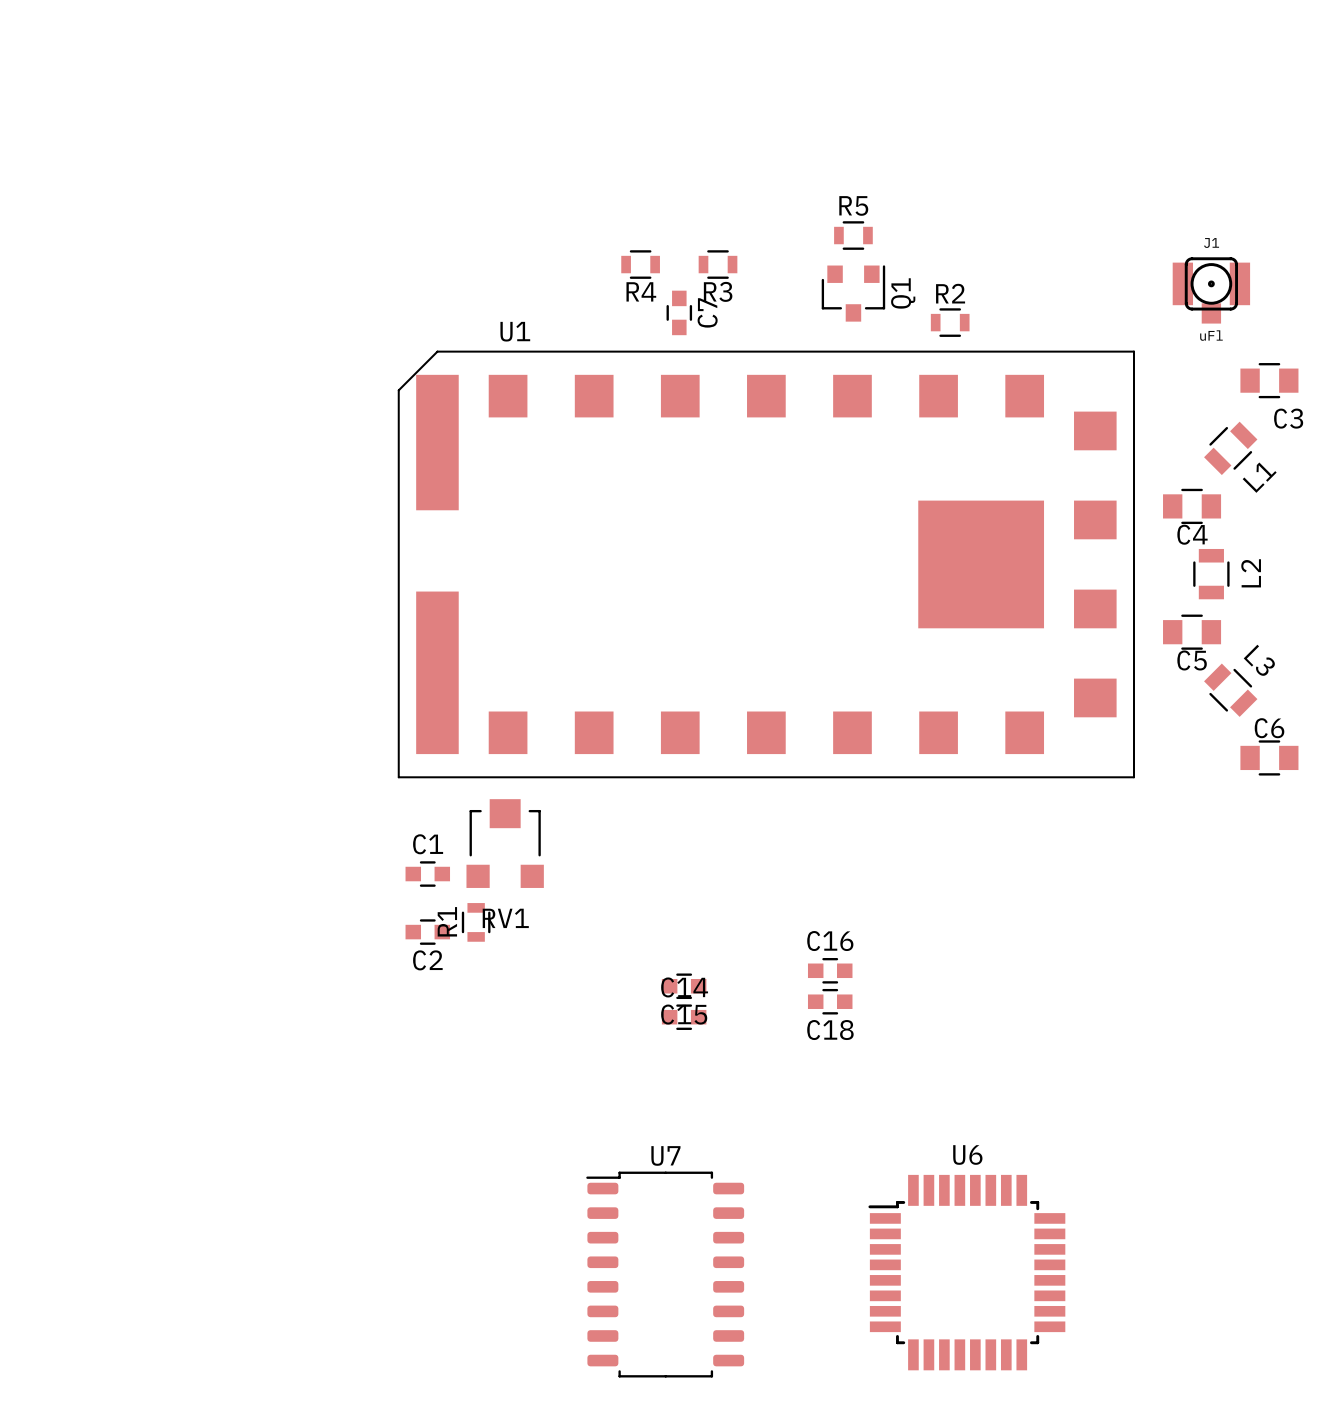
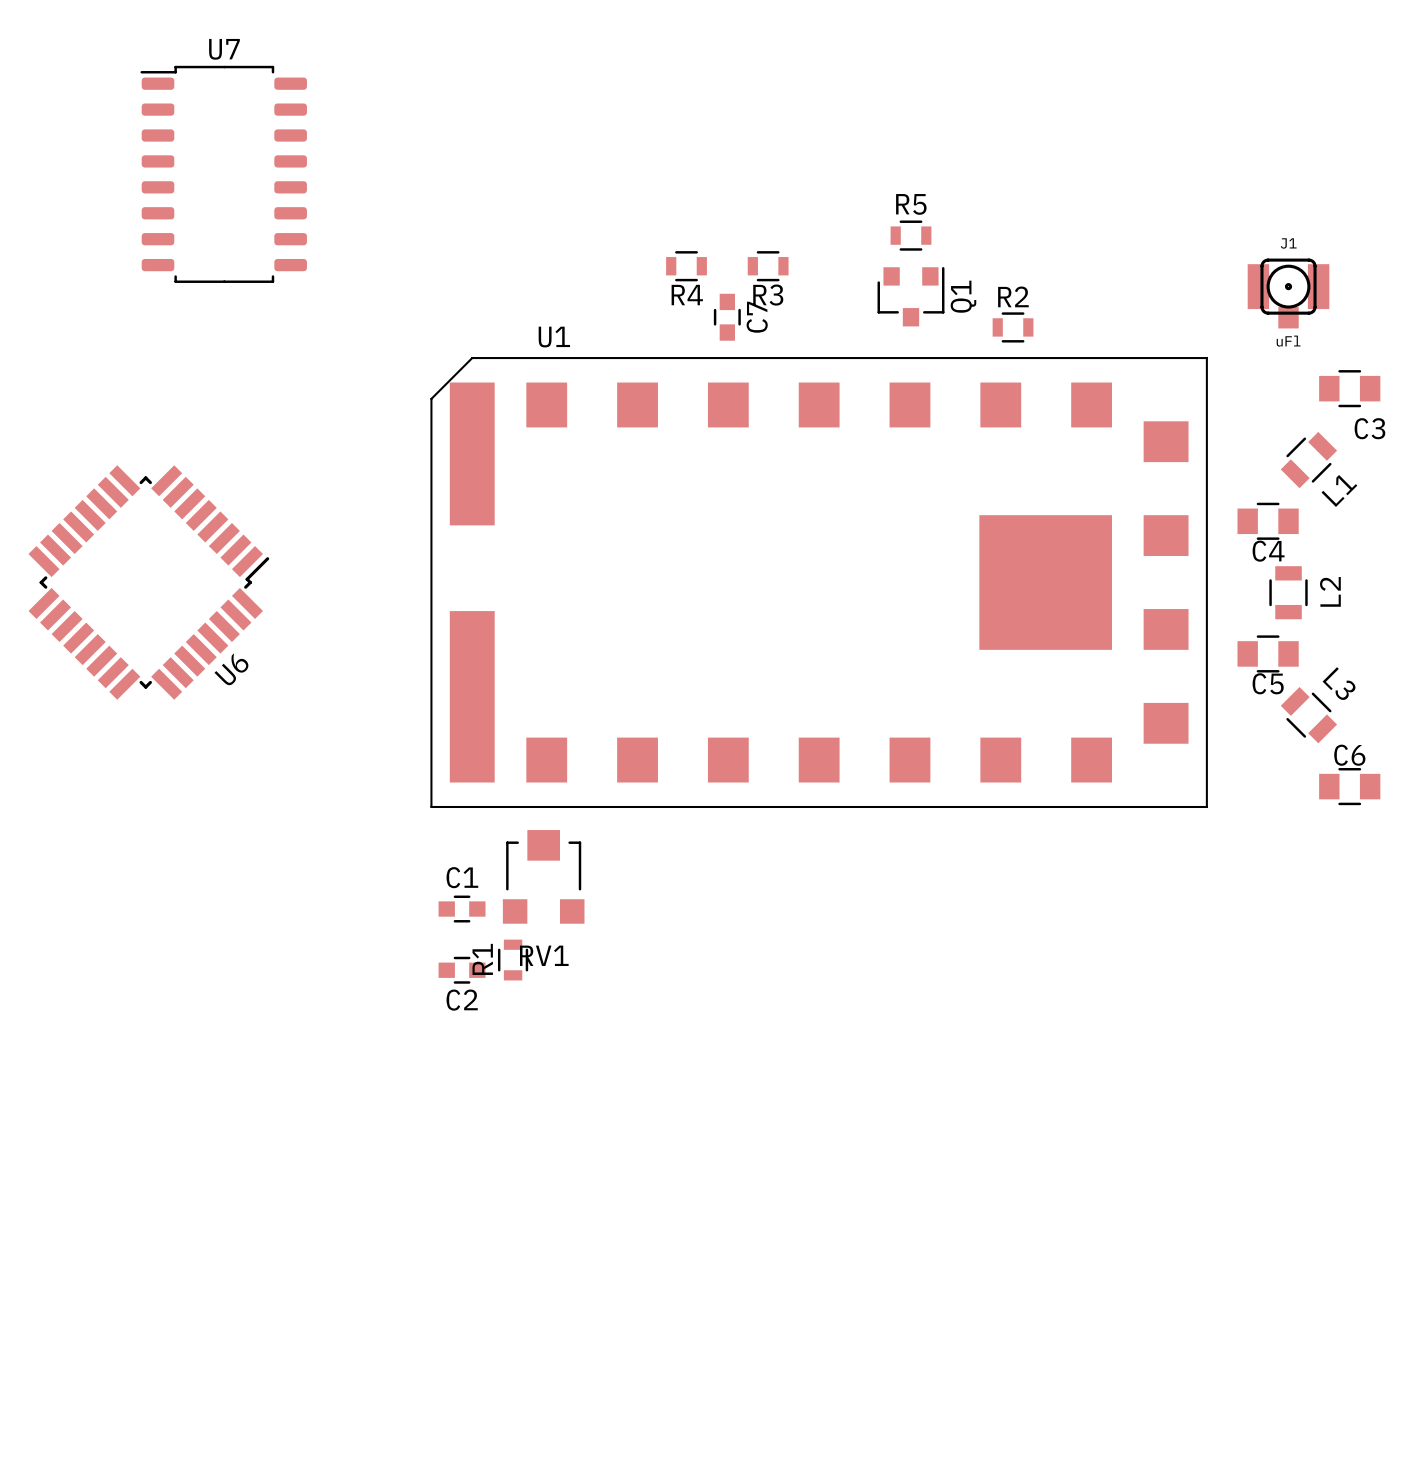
C16: (830, 970) -> none
C15: (684, 986) -> none
C18: (830, 1001) -> none
C14: (684, 1017) -> none
U6 rotation: 0° (966, 1272) -> 135° clockwise (148, 582)
U6 position: (966, 1272) -> (148, 582)
U7 position: (665, 1274) -> (223, 174)

